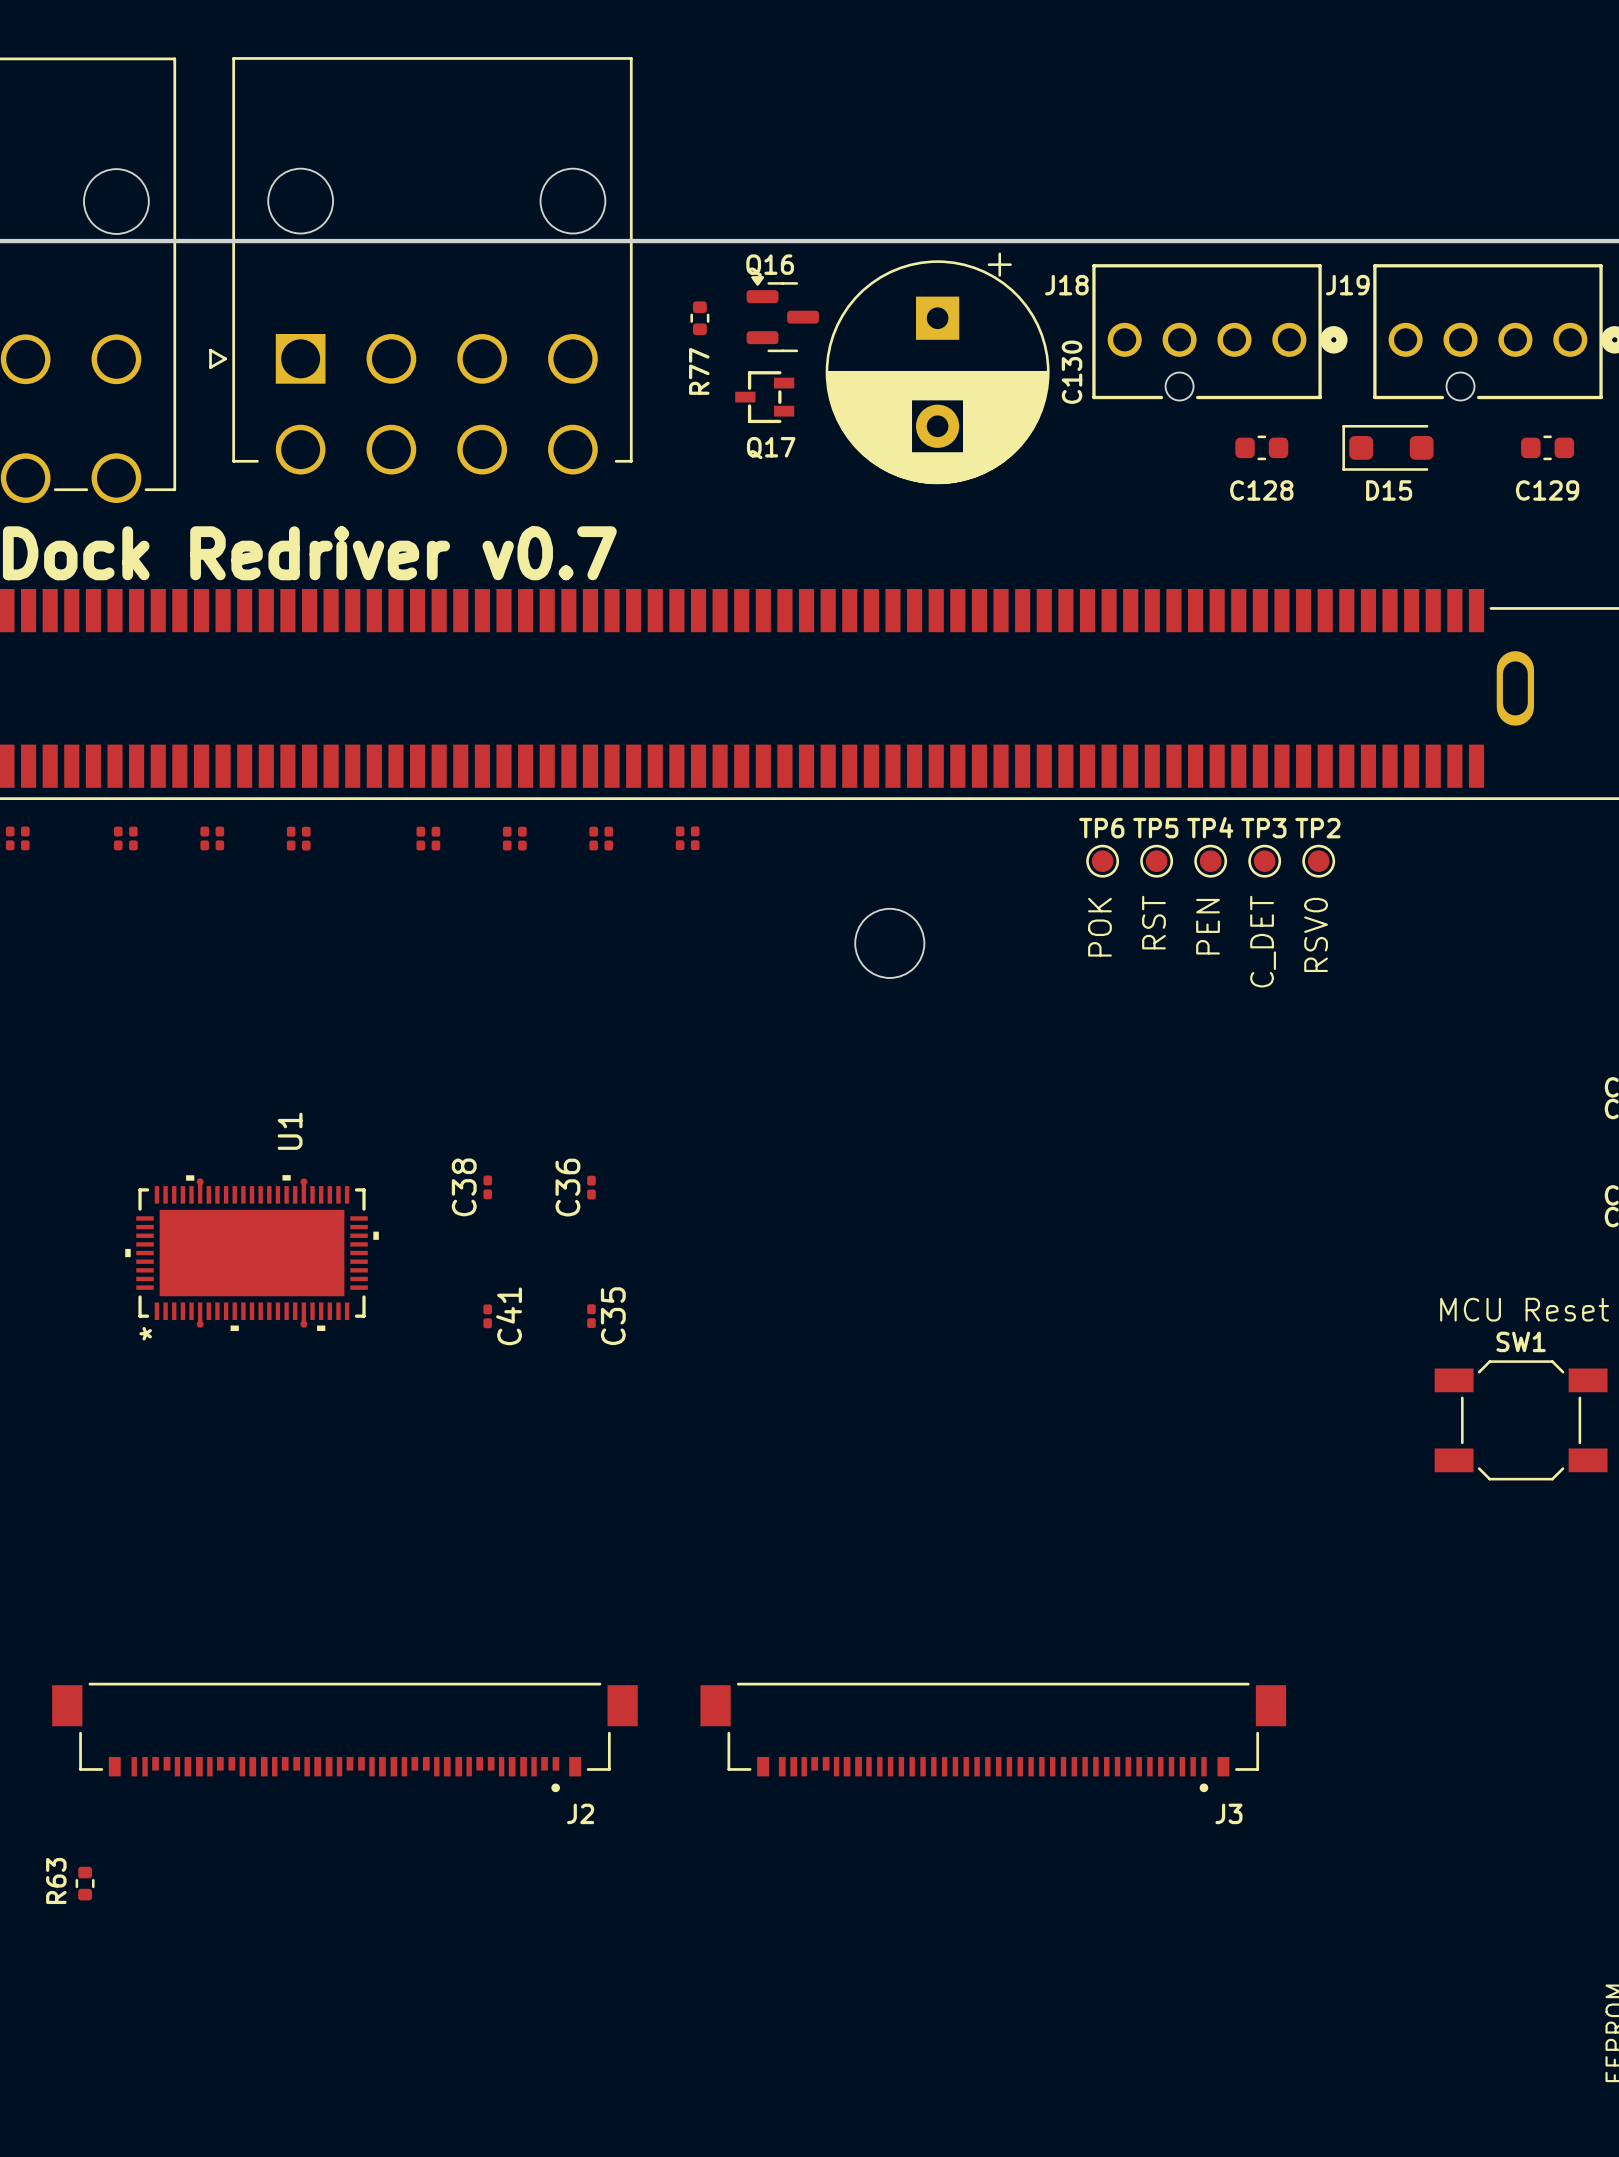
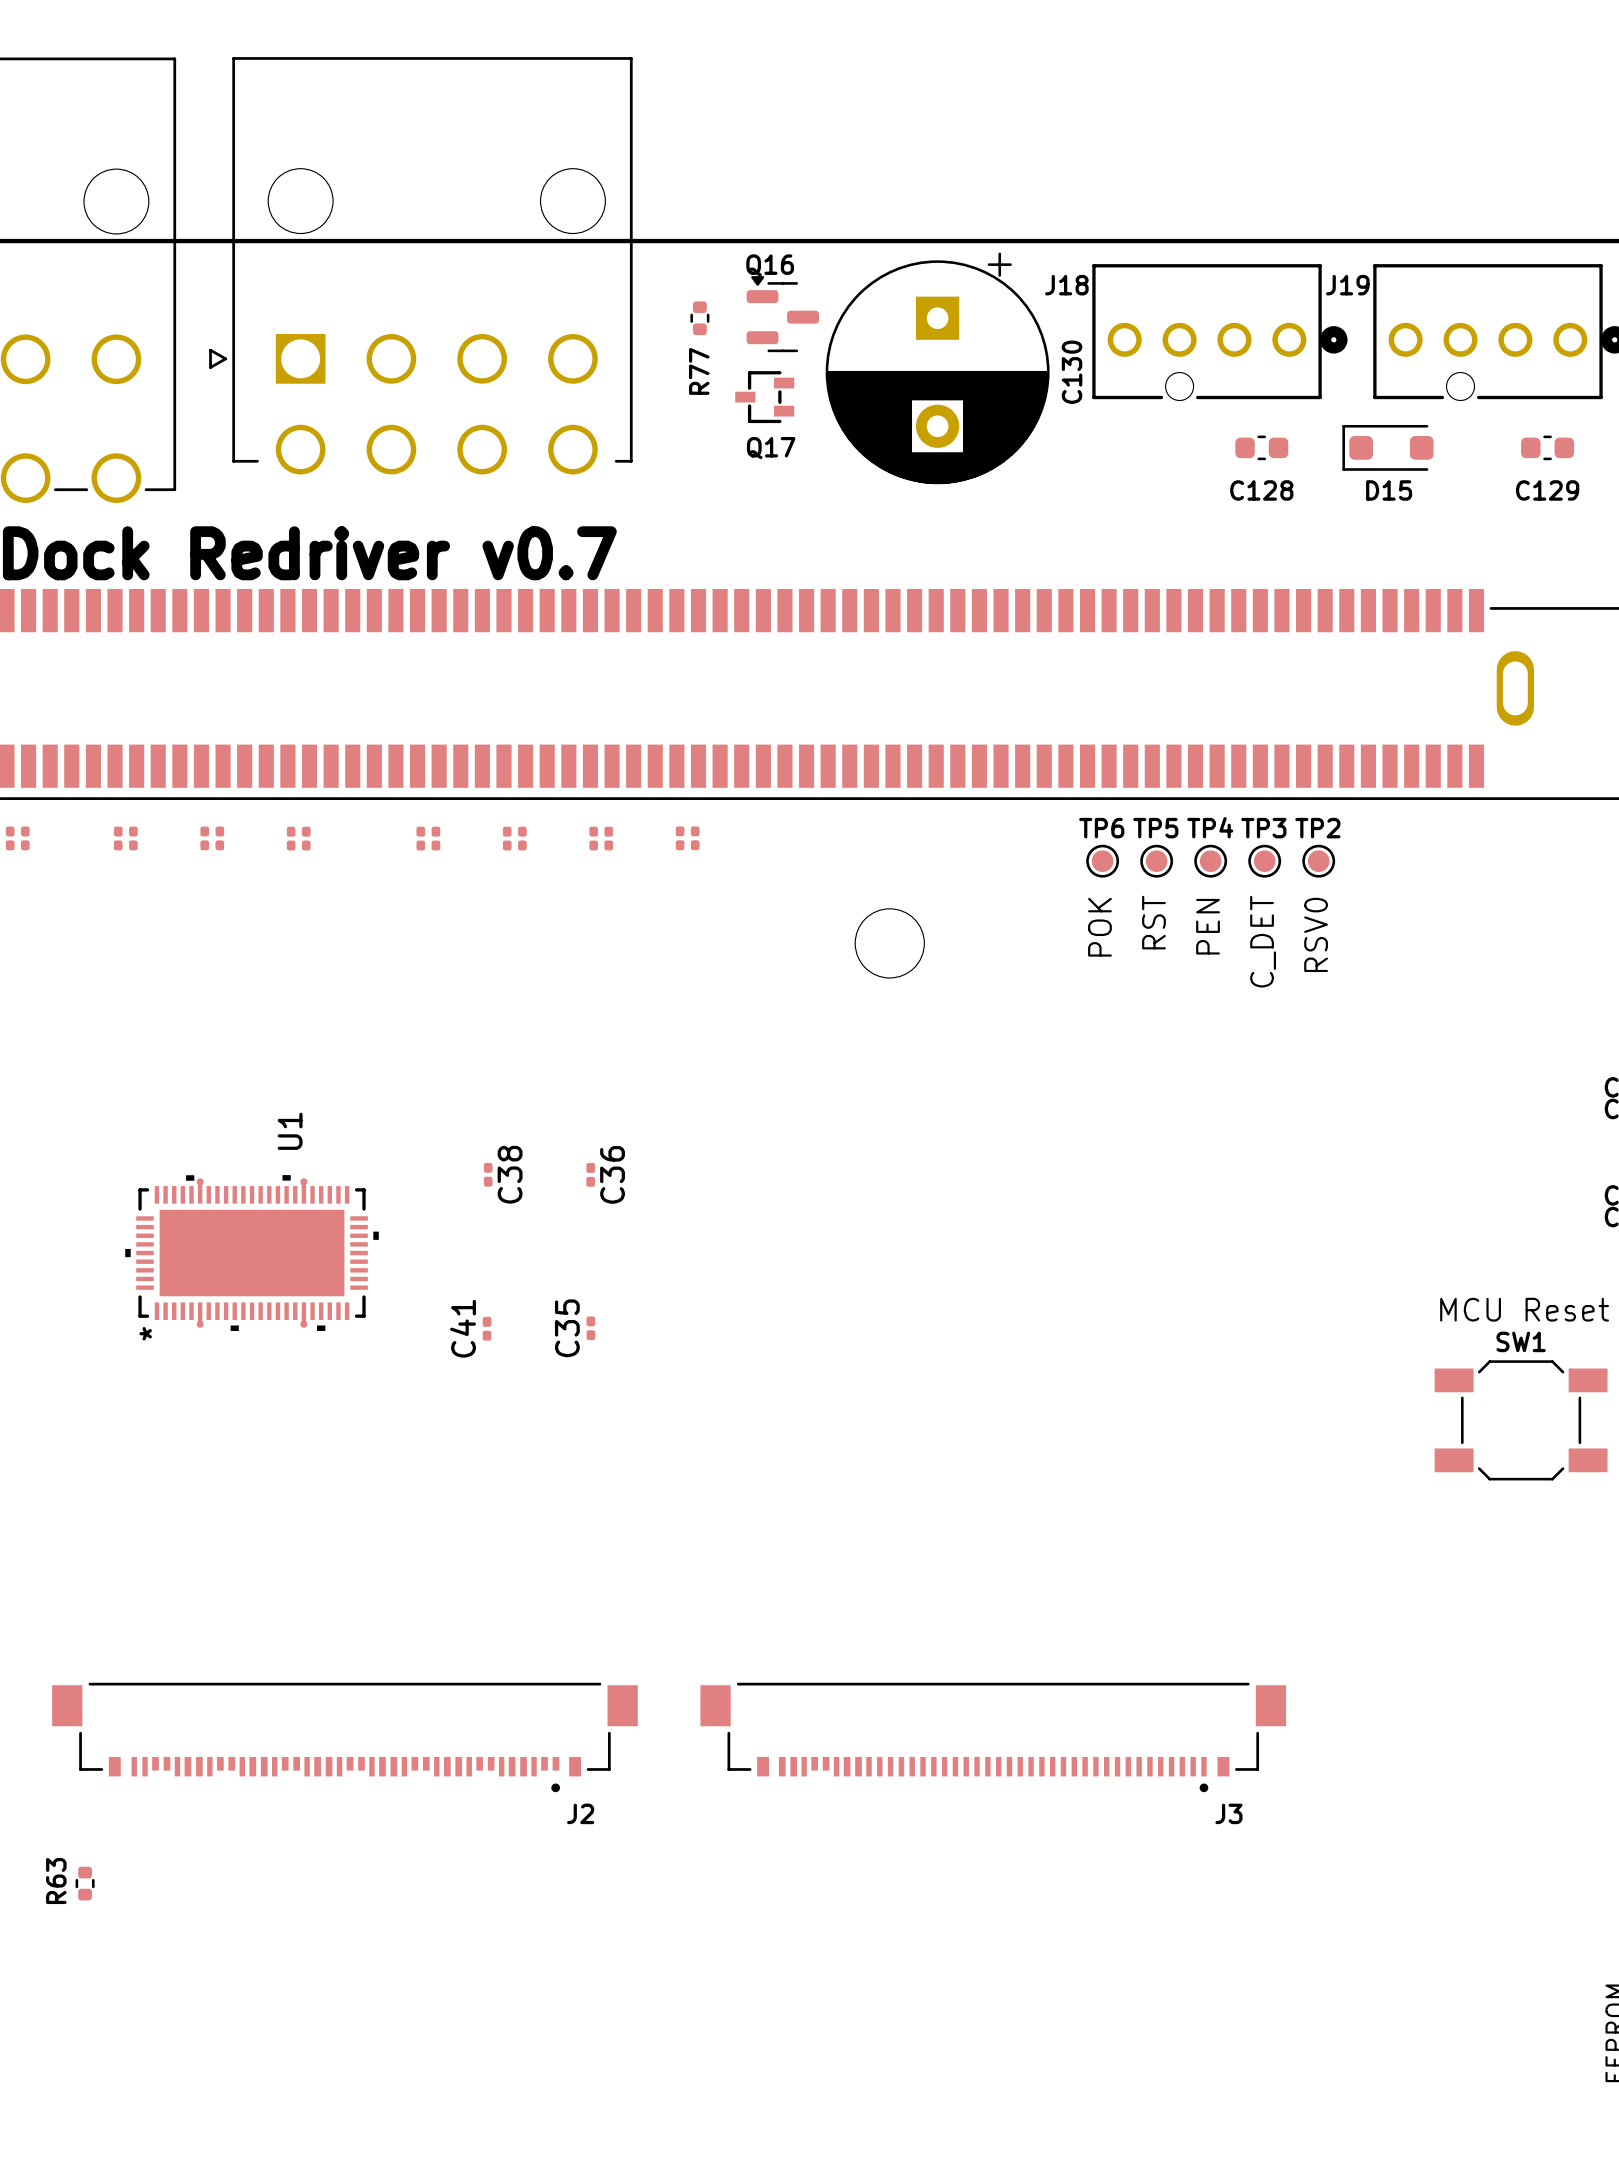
C38 name position: C38 (464, 1187) -> C38 (510, 1174)
C38 position: (487, 1187) -> (488, 1174)
C36 name position: C36 (567, 1187) -> C36 (612, 1174)
C36 position: (591, 1187) -> (590, 1174)
C41 position: (487, 1316) -> (487, 1328)
C41 name position: C41 (509, 1316) -> C41 (463, 1328)
C35 position: (591, 1316) -> (590, 1328)
C35 name position: C35 (613, 1316) -> C35 (567, 1328)

